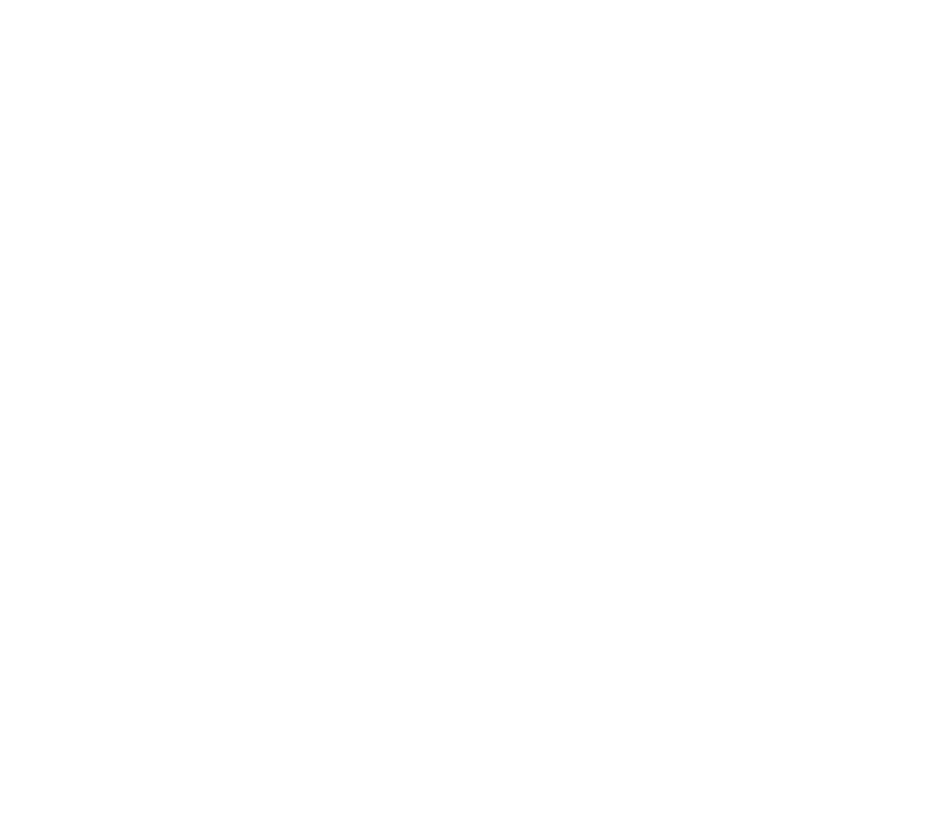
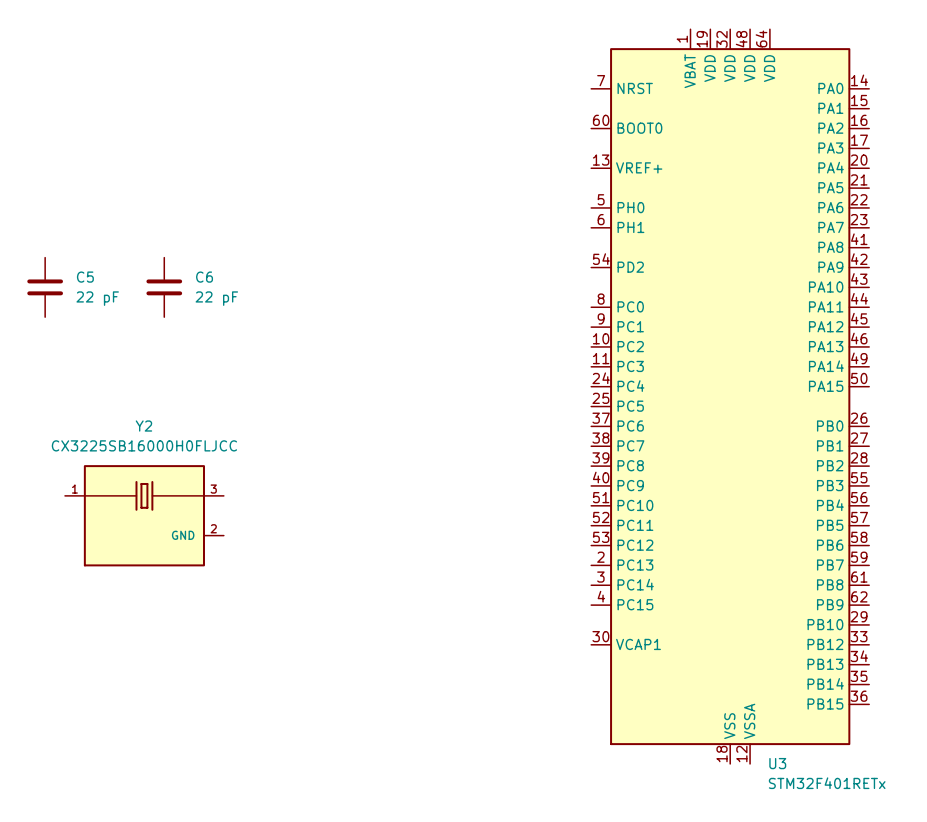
C5: none -> 22 pF (45, 287)
C6: none -> 22 pF (164, 287)
U3: none -> STM32F401RETx (730, 396)
Y2: none -> CX3225SB16000H0FLJCC (144, 515)

